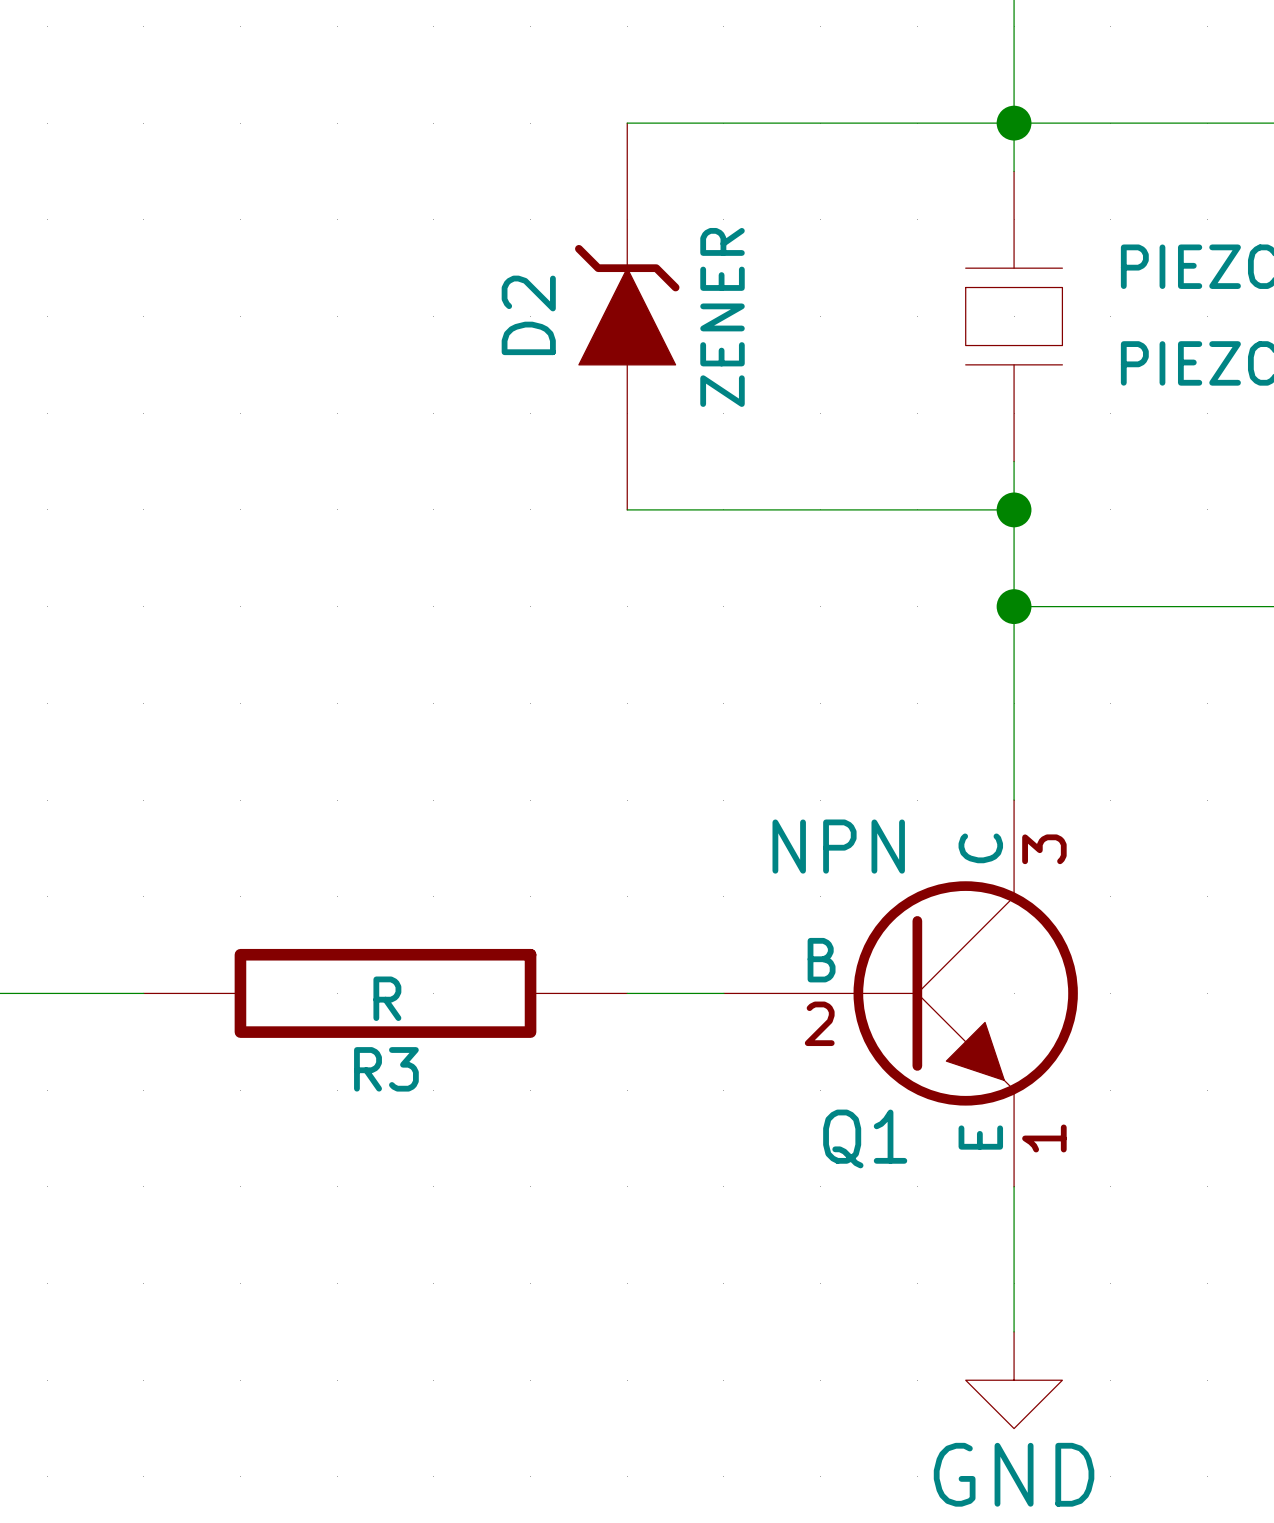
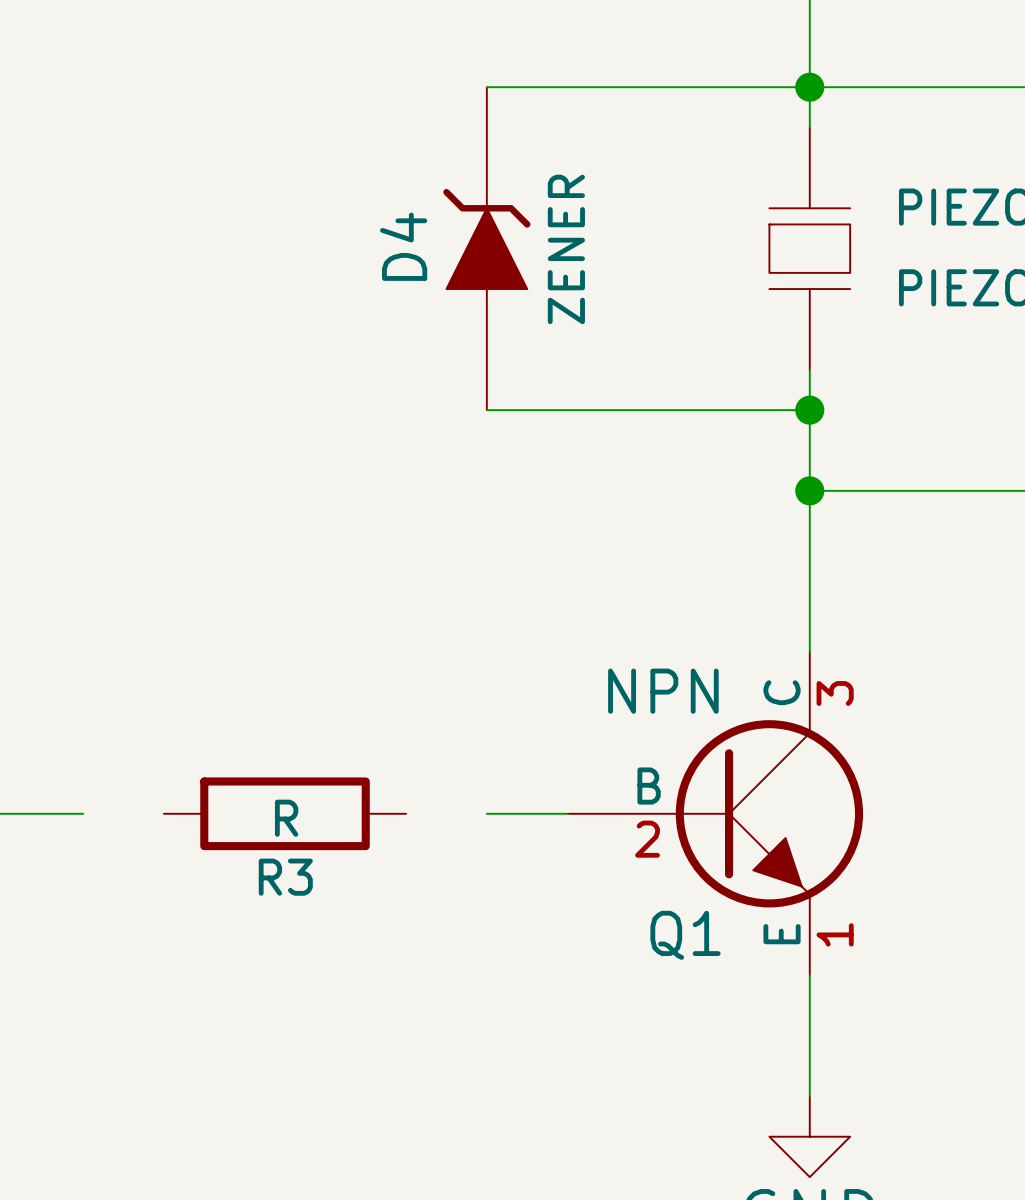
D2 name: D2 (528, 315) -> D4 (403, 246)
R3 symbol: [143, 948, 628, 1038] -> [163, 777, 407, 851]

